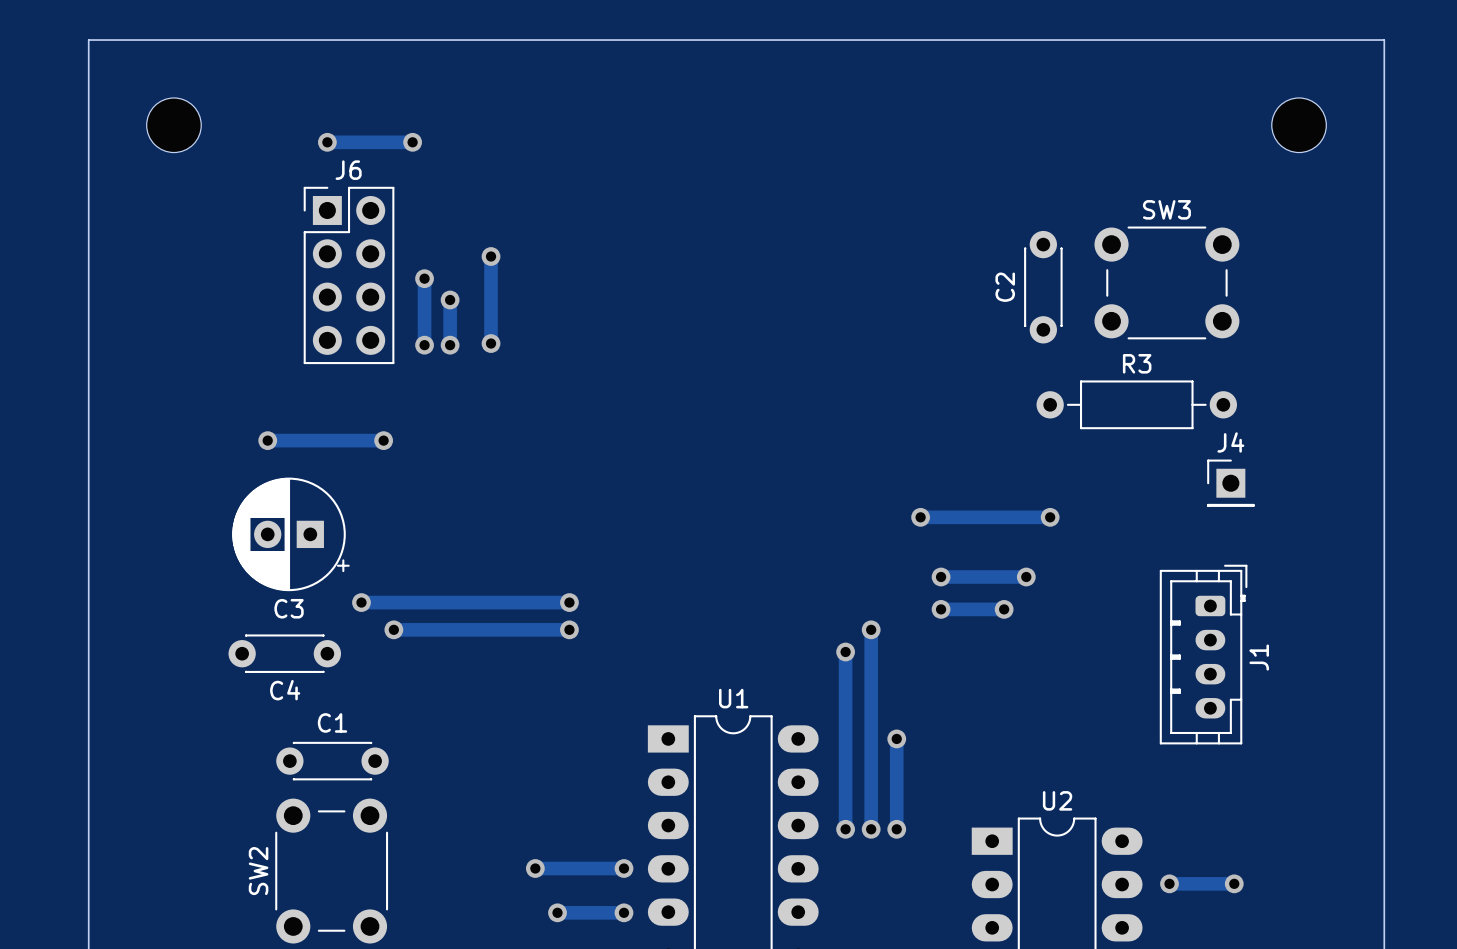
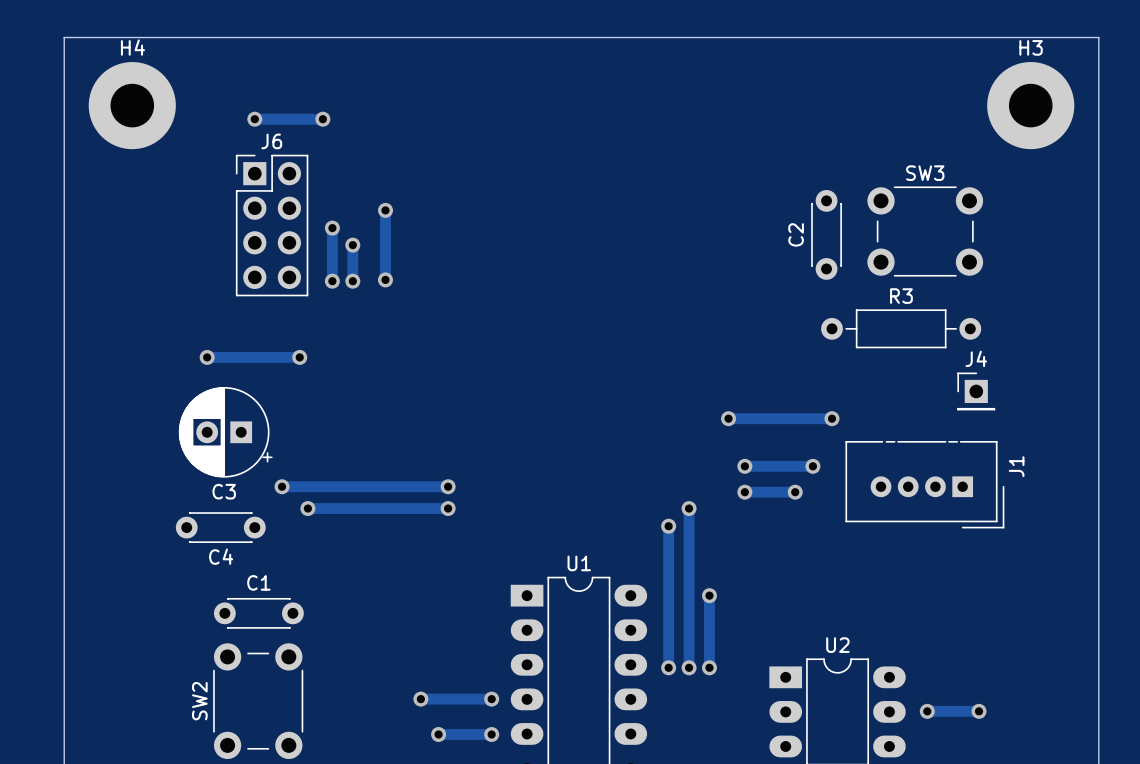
part: (173, 125) -> none
H4: none -> (132, 105)
part: (1299, 125) -> none
H3: none -> (1030, 105)
J1 footprint: [1159, 564, 1248, 745] -> [845, 441, 1005, 529]
J1 name position: J1 (1259, 657) -> J1 (1016, 466)

